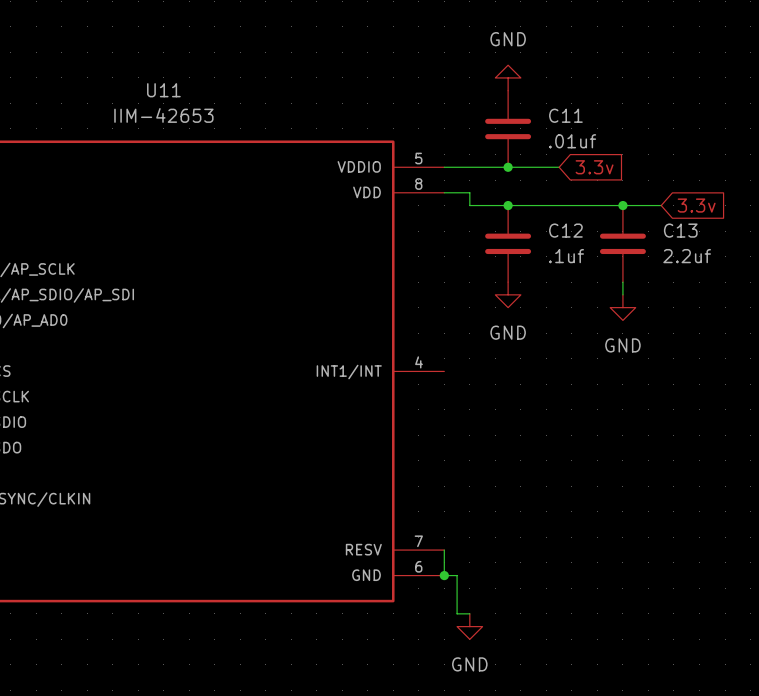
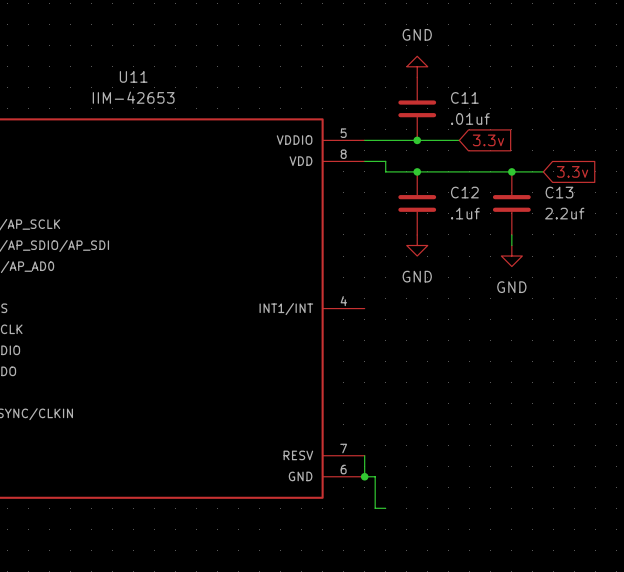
power symbol: GND (469, 626) -> none

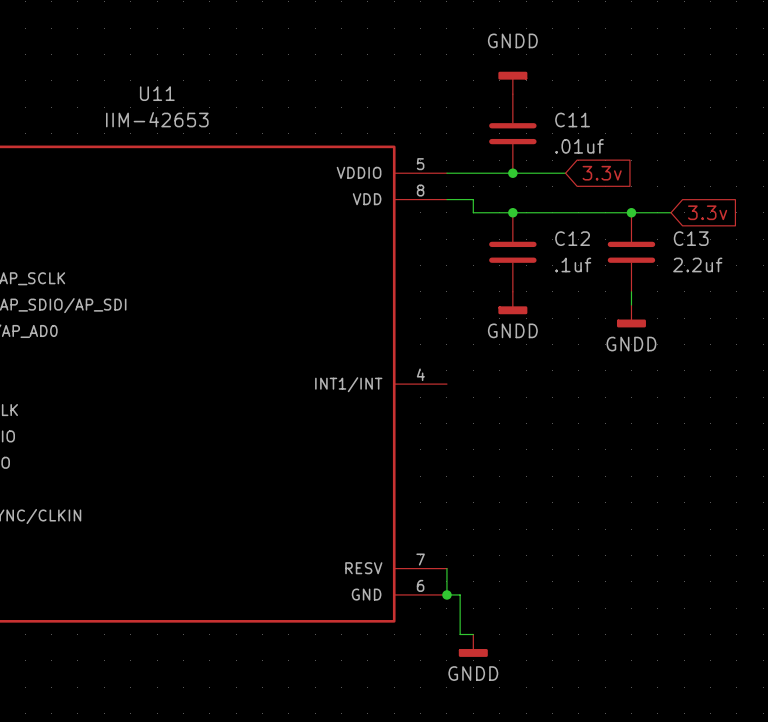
power symbol: GND (417, 66) -> GNDD (512, 82)
power symbol: GND (417, 245) -> GNDD (512, 303)
power symbol: GND (511, 256) -> GNDD (631, 316)
power symbol: none -> GNDD (473, 645)

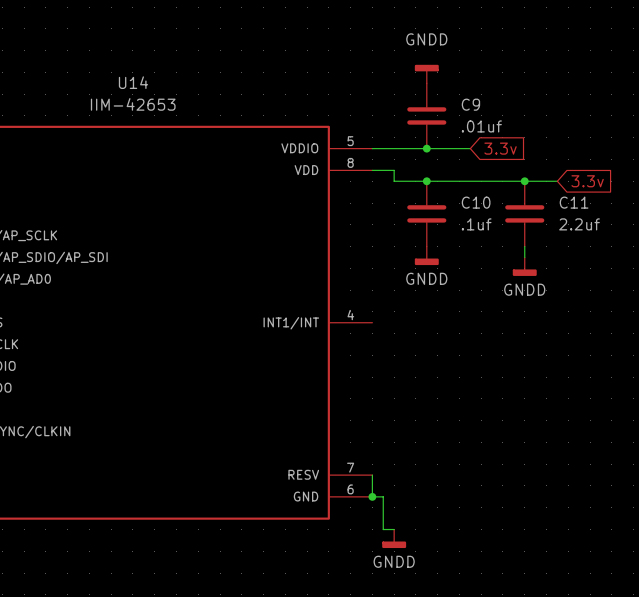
U11 name: U11 (157, 93) -> U14 (133, 82)
C11 name: C11 (572, 120) -> C9 (470, 104)
C12 name: C12 (572, 238) -> C10 (476, 202)
C13 name: C13 (691, 238) -> C11 (574, 202)

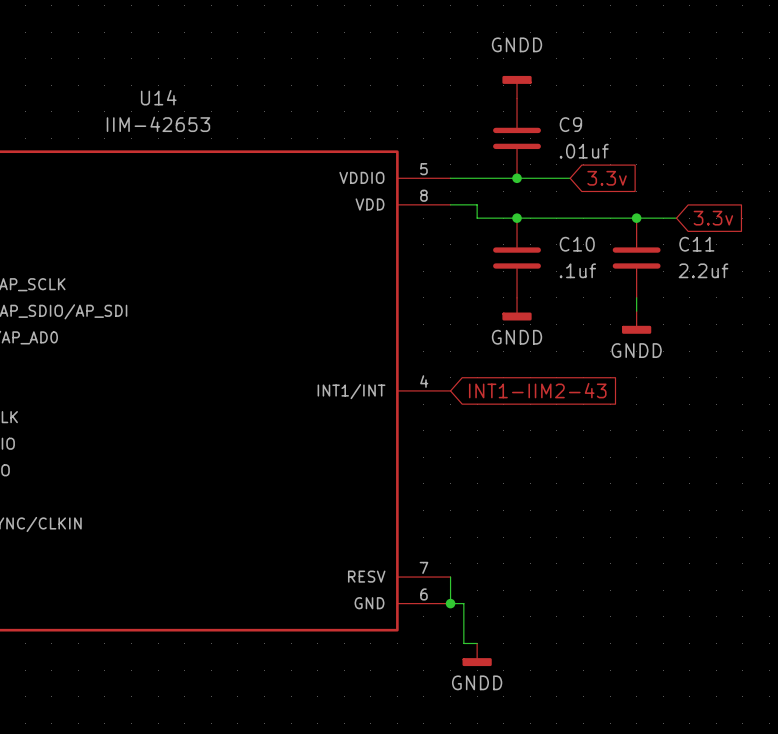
global label: none -> INT1-IIM2-43 (537, 390)

